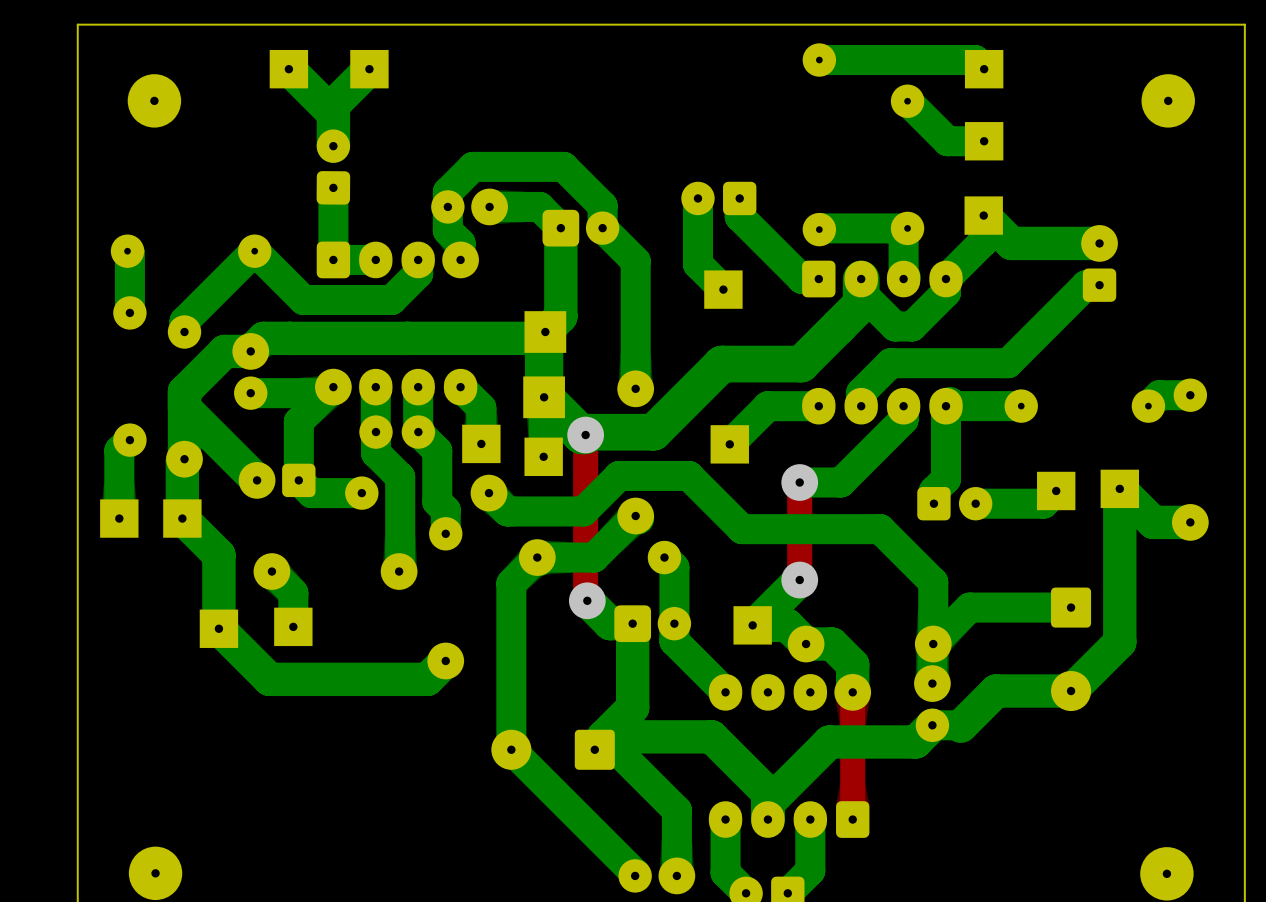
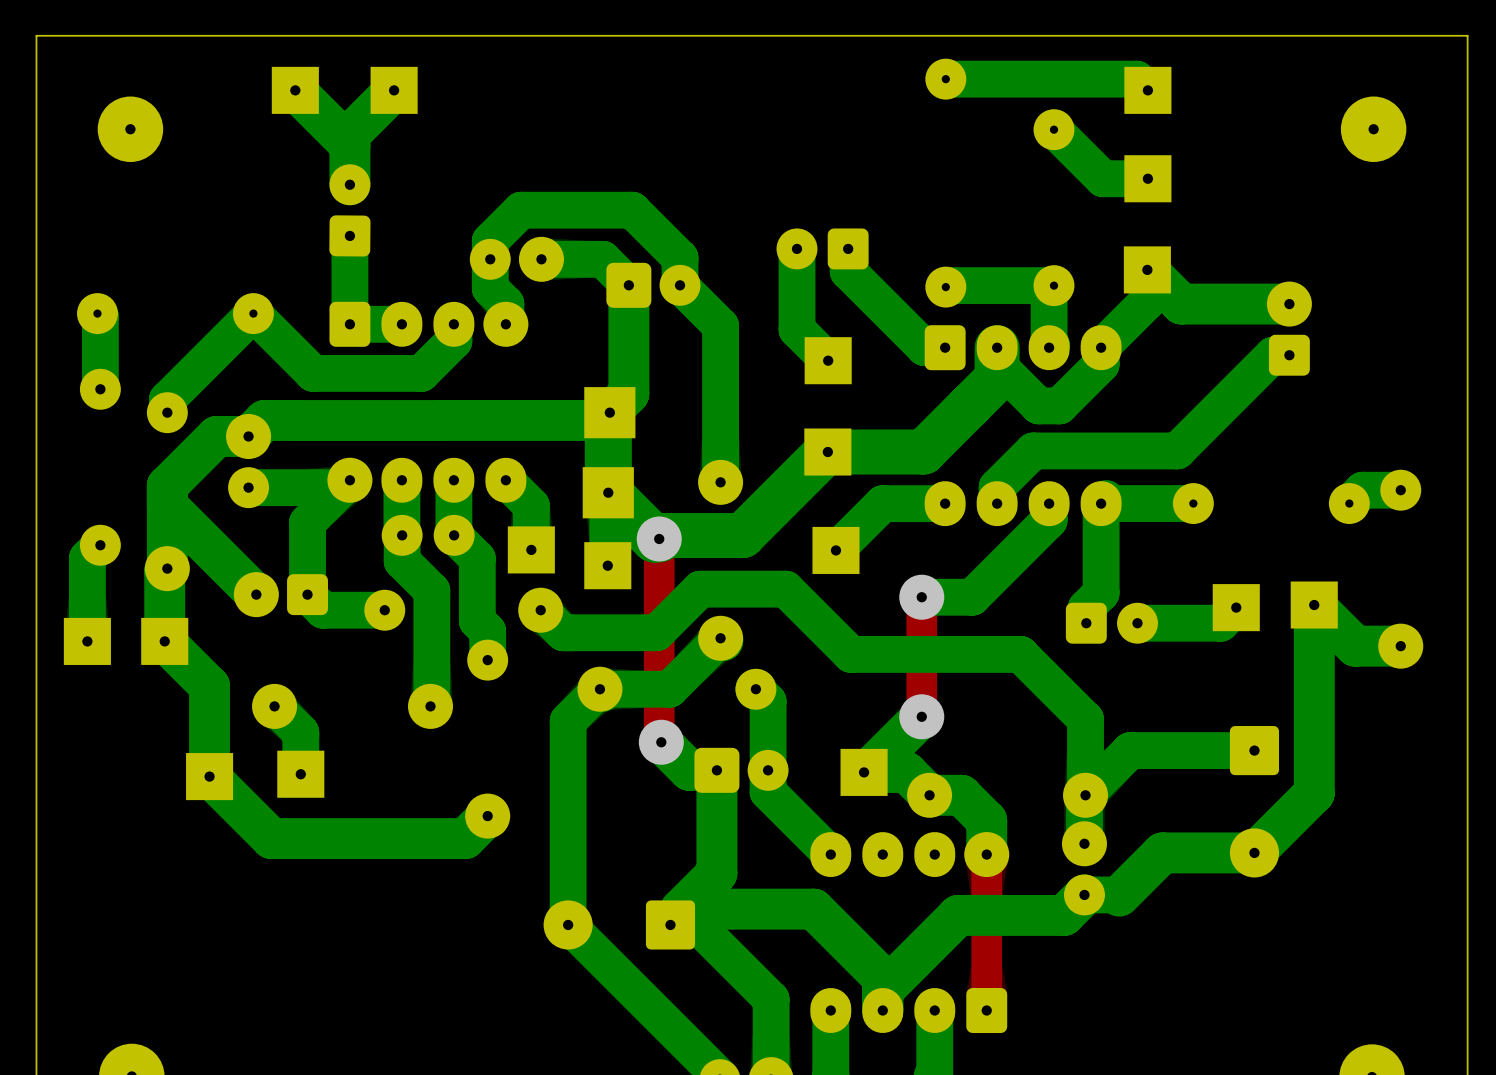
part: none -> (827, 452)

